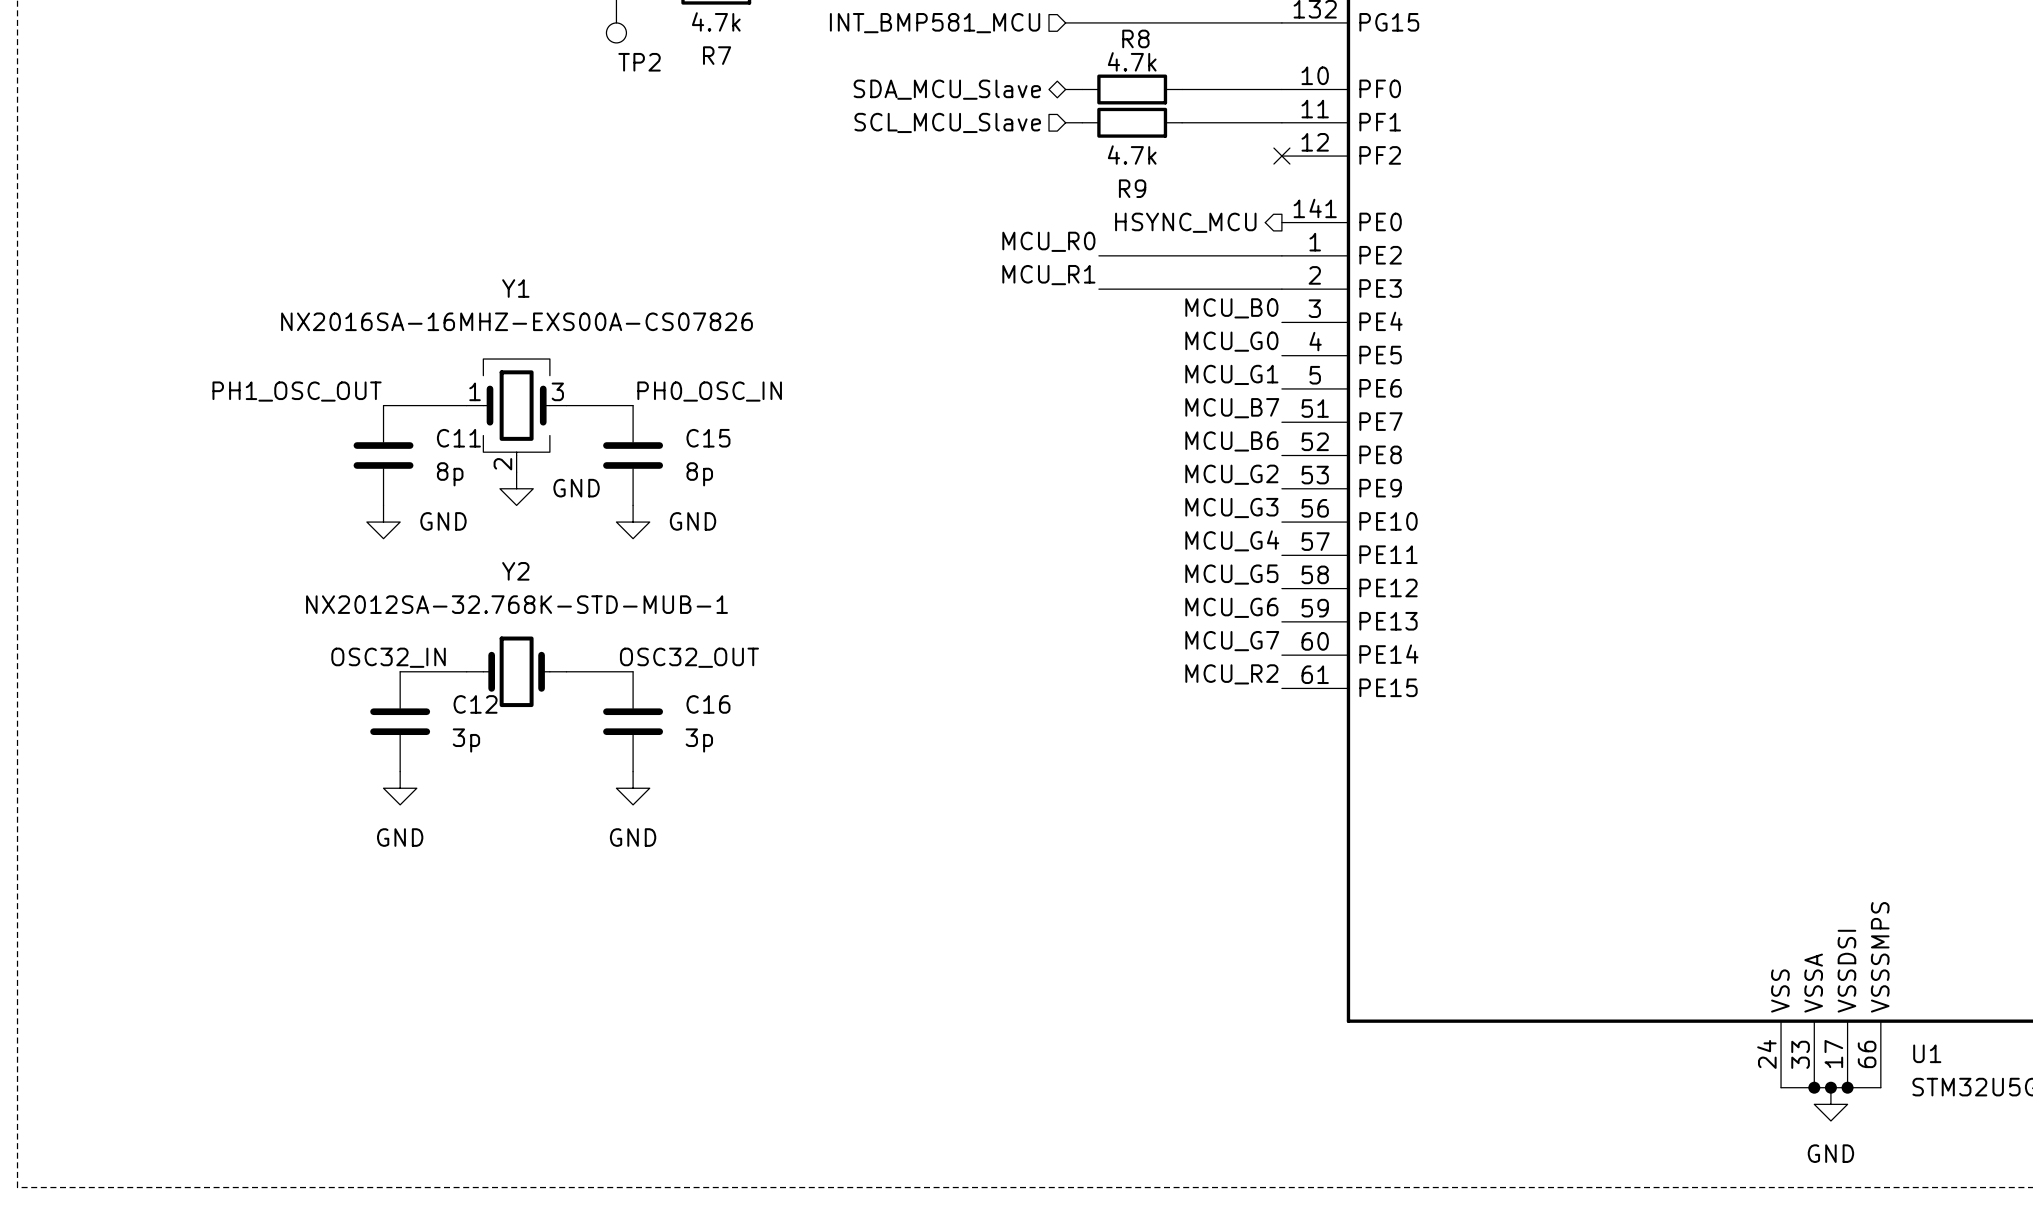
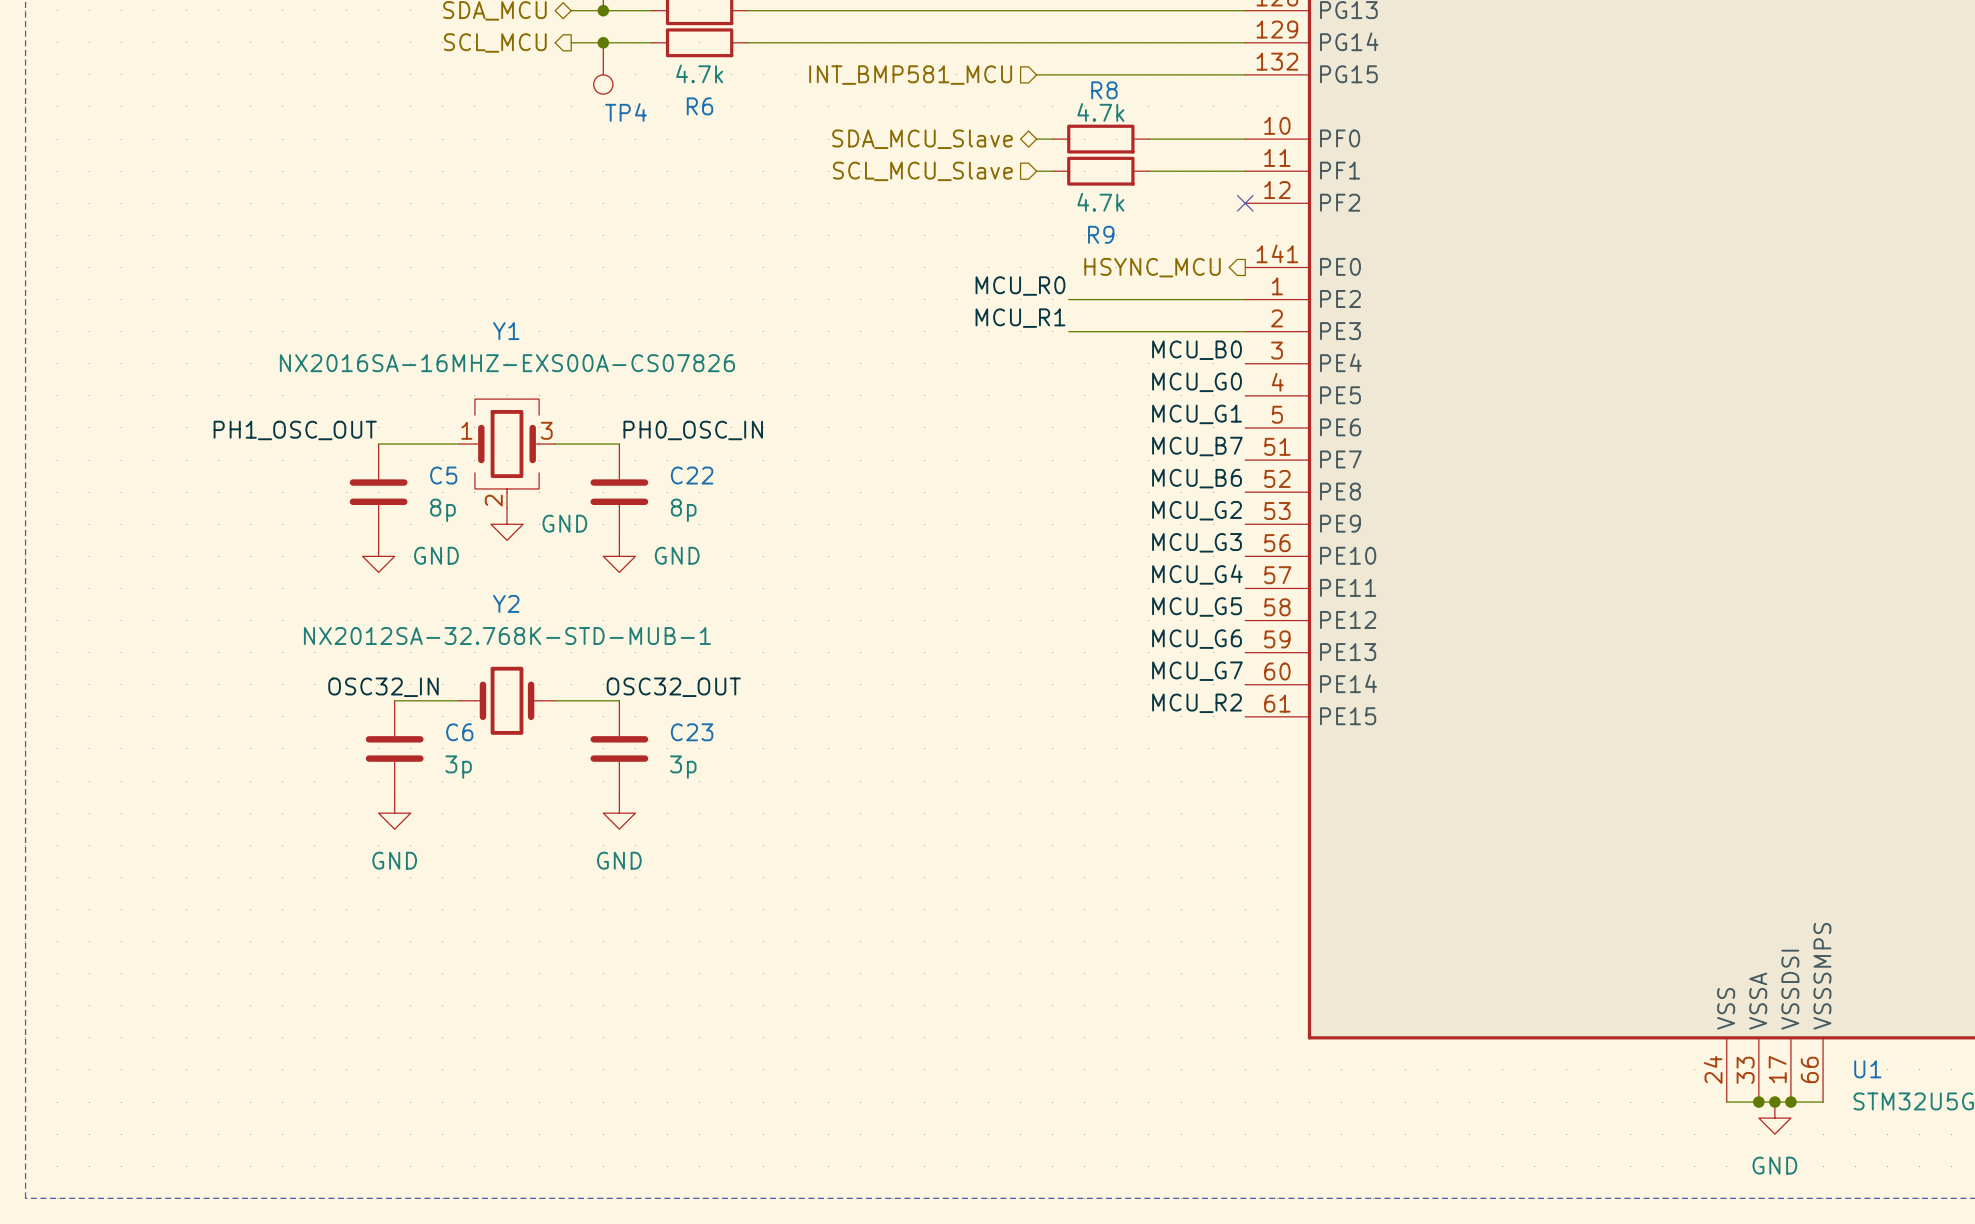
R7 name: R7 (717, 55) -> R6 (699, 106)
TP2 name: TP2 (639, 62) -> TP4 (625, 112)
C11 name: C11 (458, 438) -> C5 (443, 475)
C15 name: C15 (708, 438) -> C22 (692, 475)
C12 name: C12 (475, 704) -> C6 (459, 732)
C16 name: C16 (708, 704) -> C23 (692, 732)

